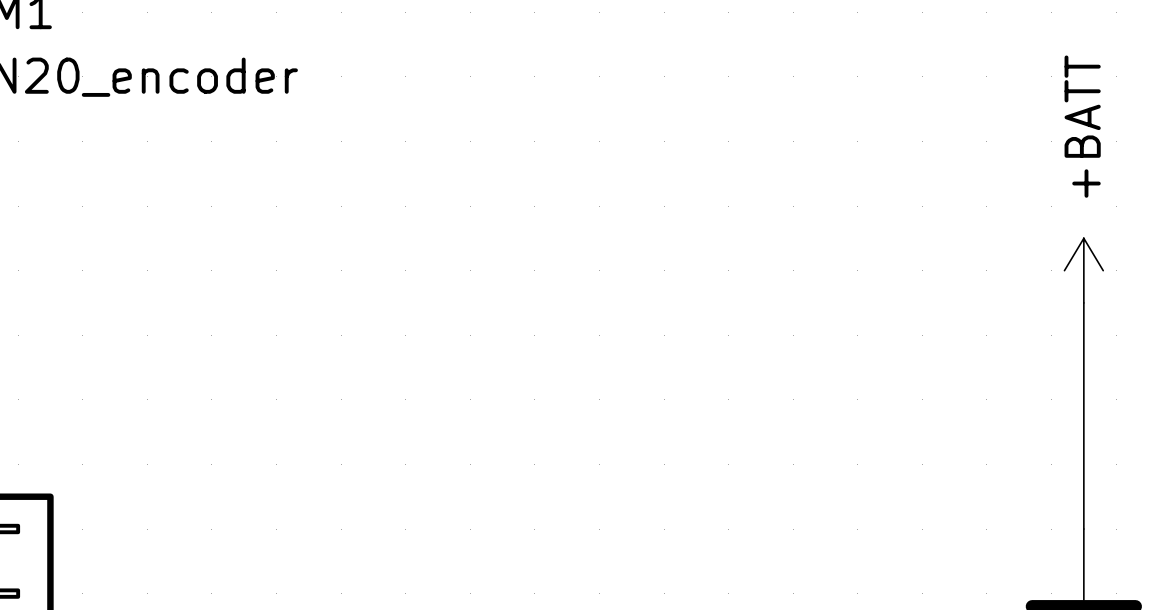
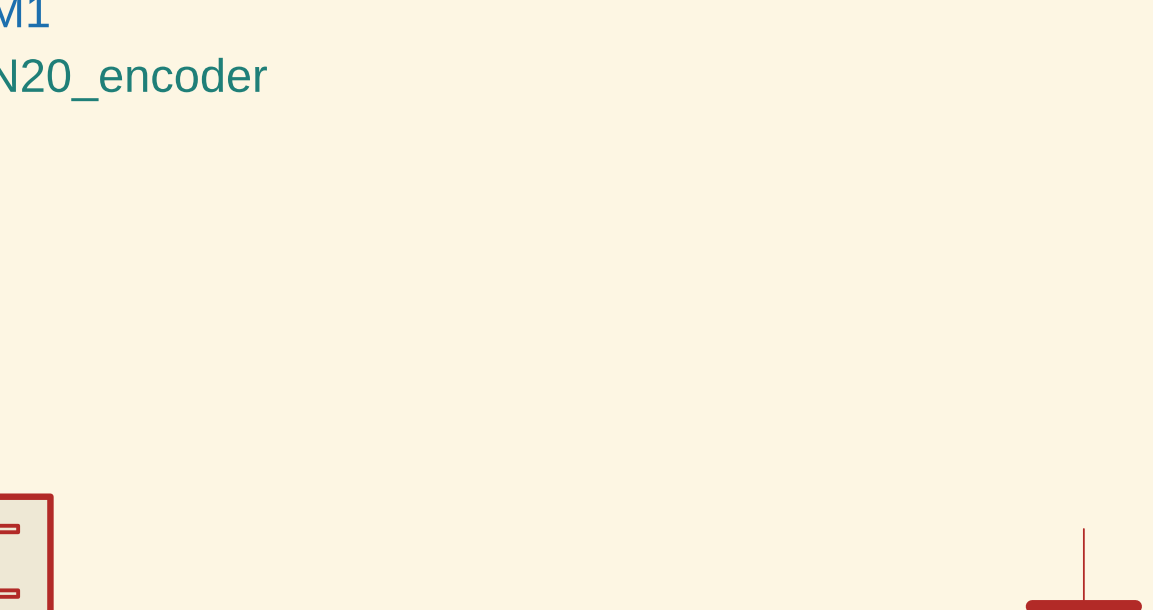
power symbol: +BATT (1083, 270) -> none
wire: (1083, 302) (1083, 529) -> none

